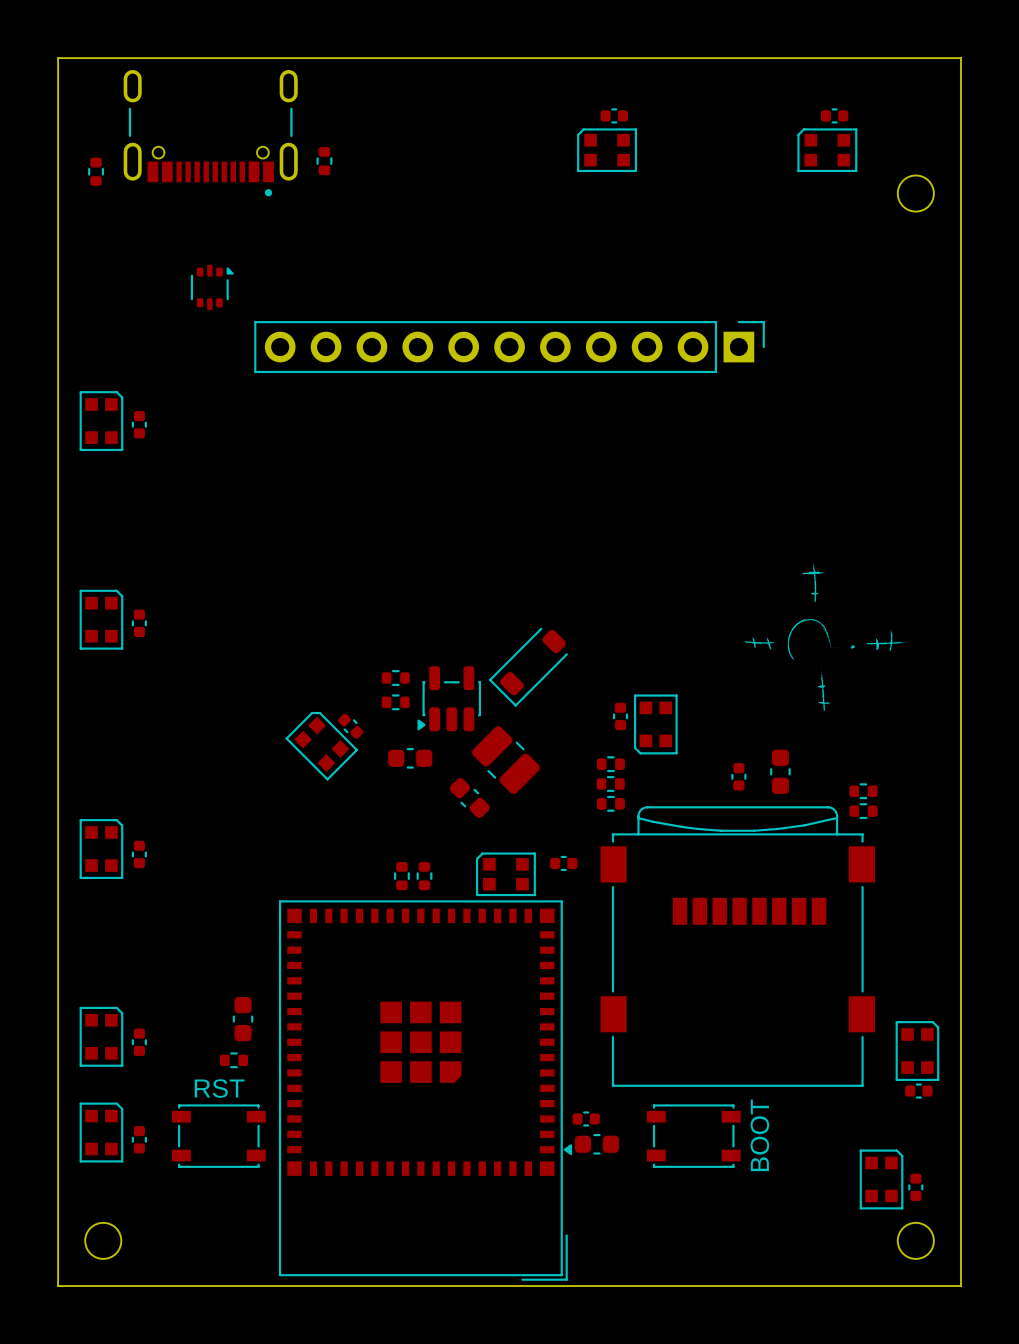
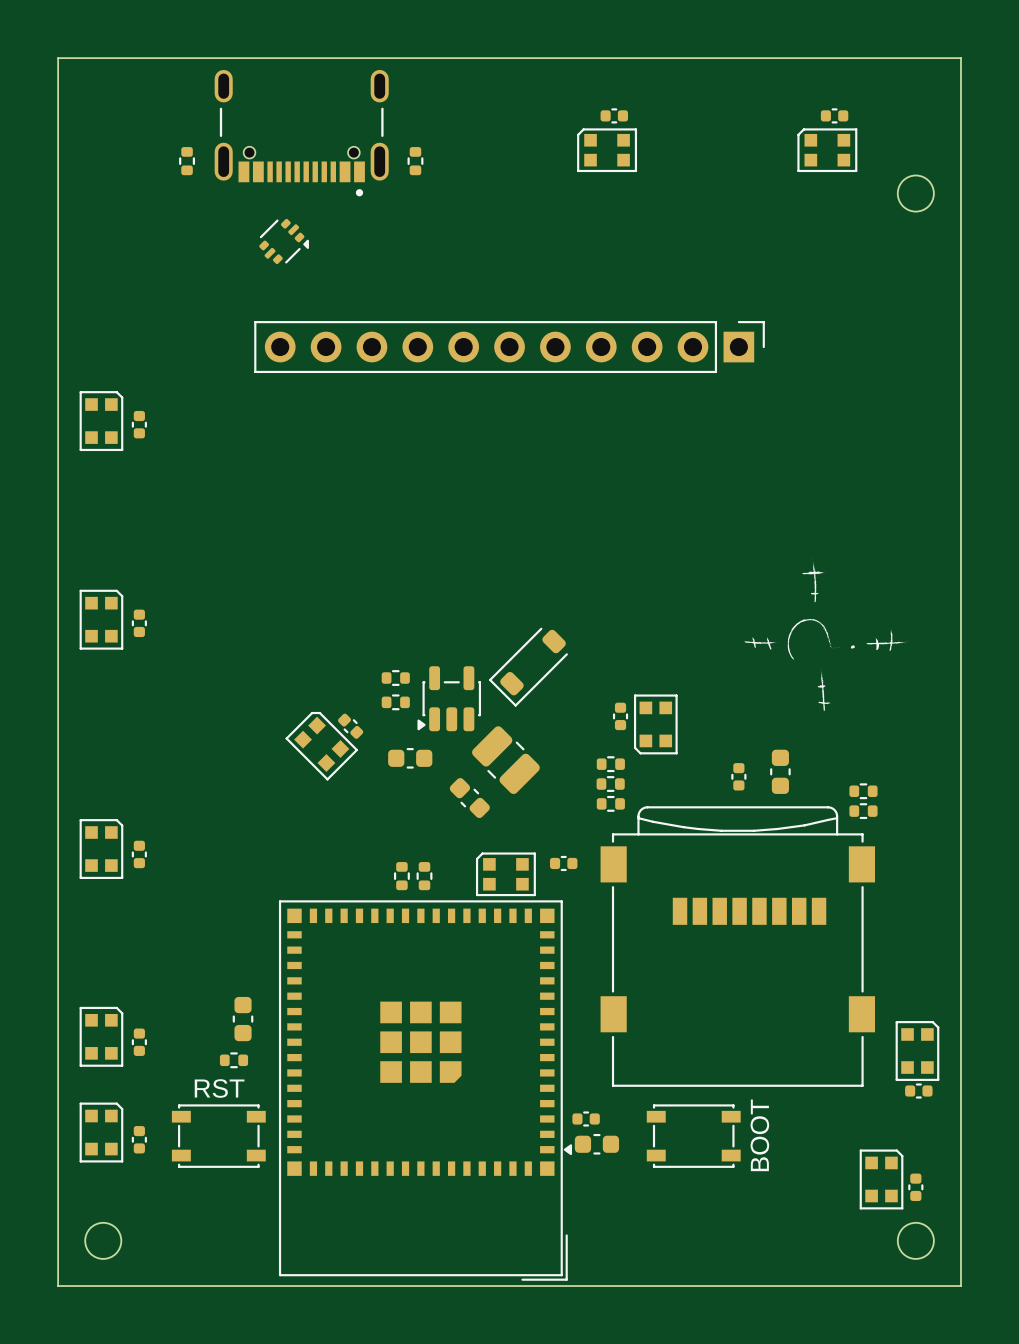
part position: (210, 133) -> (301, 133)
part: none -> (187, 161)
part: (324, 161) -> none
part: none -> (415, 161)
part: (96, 171) -> none
part: none -> (284, 241)
part: (212, 287) -> none

